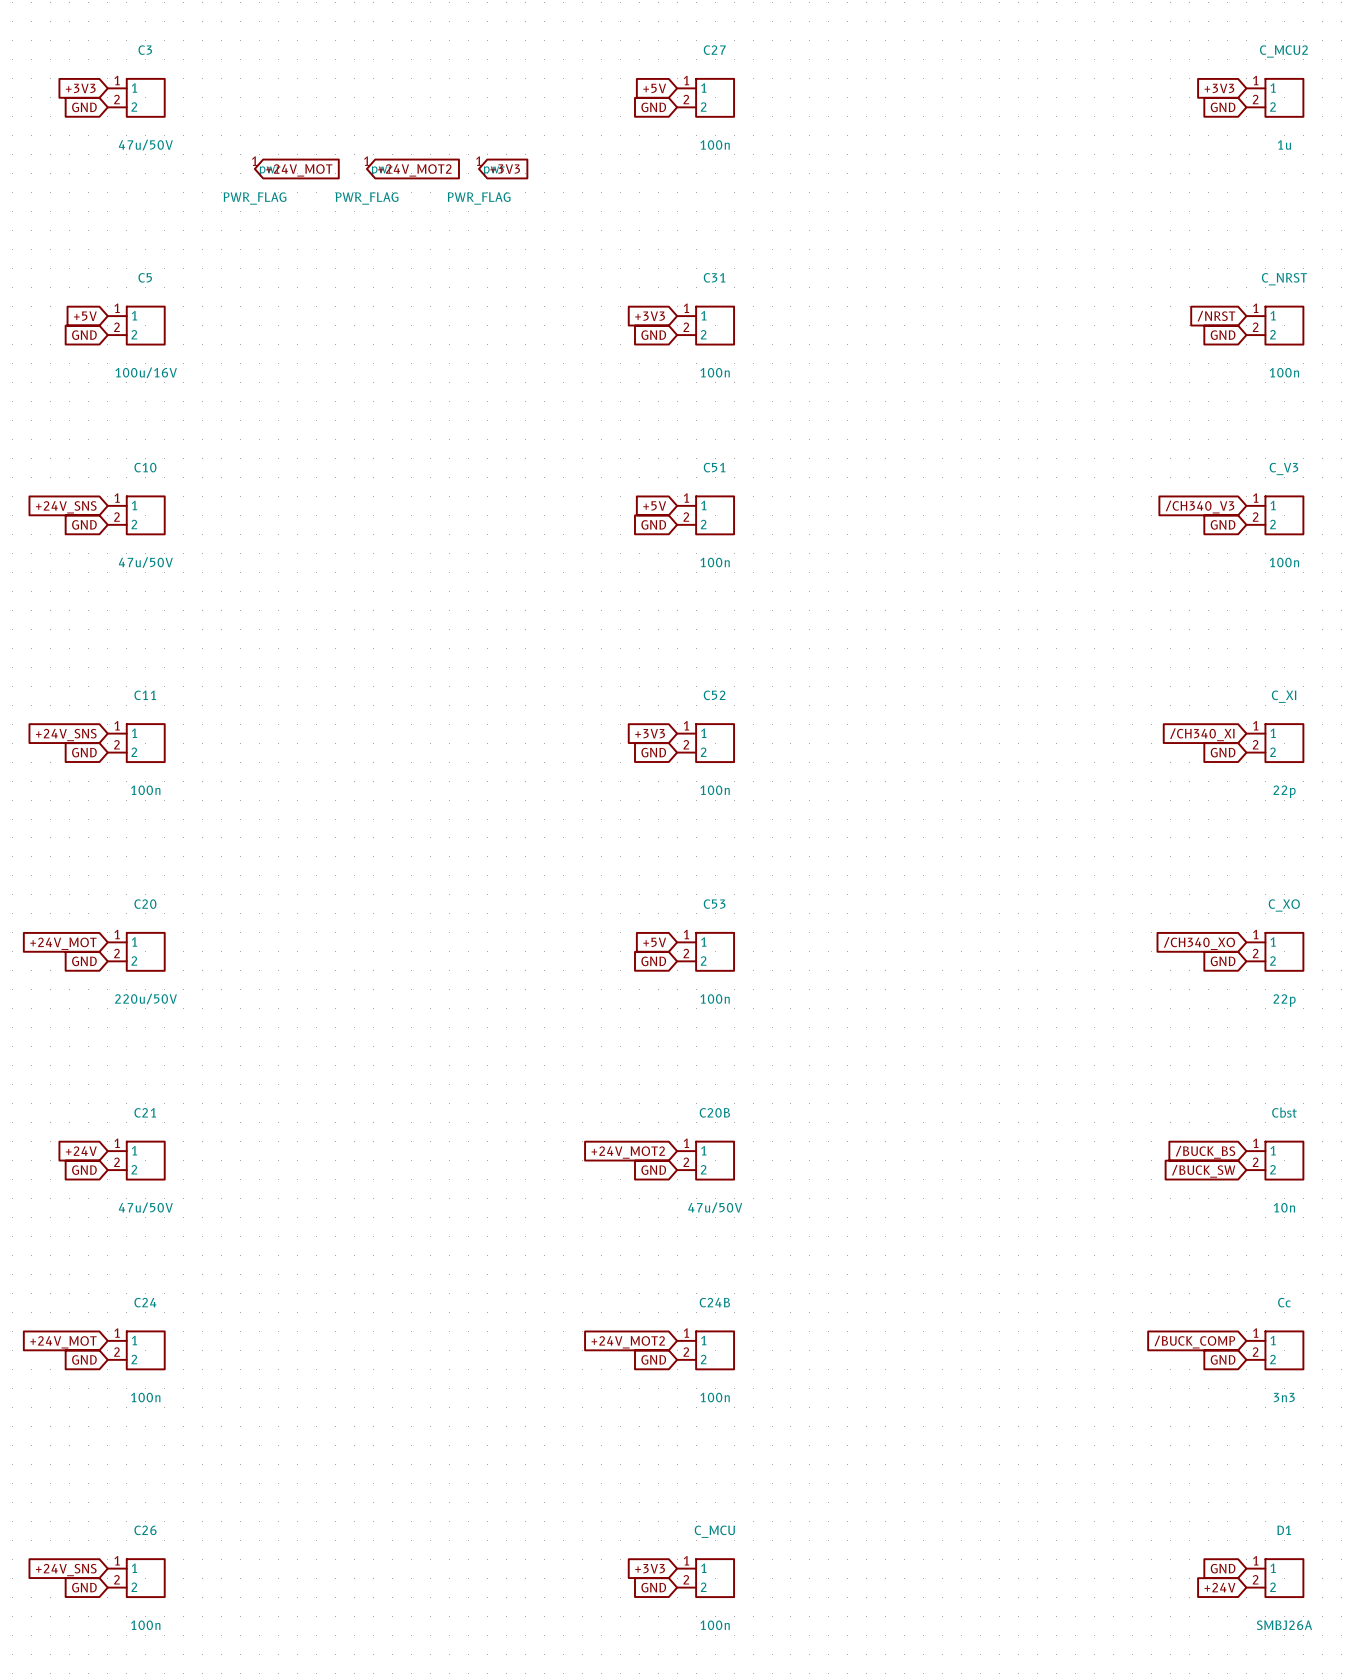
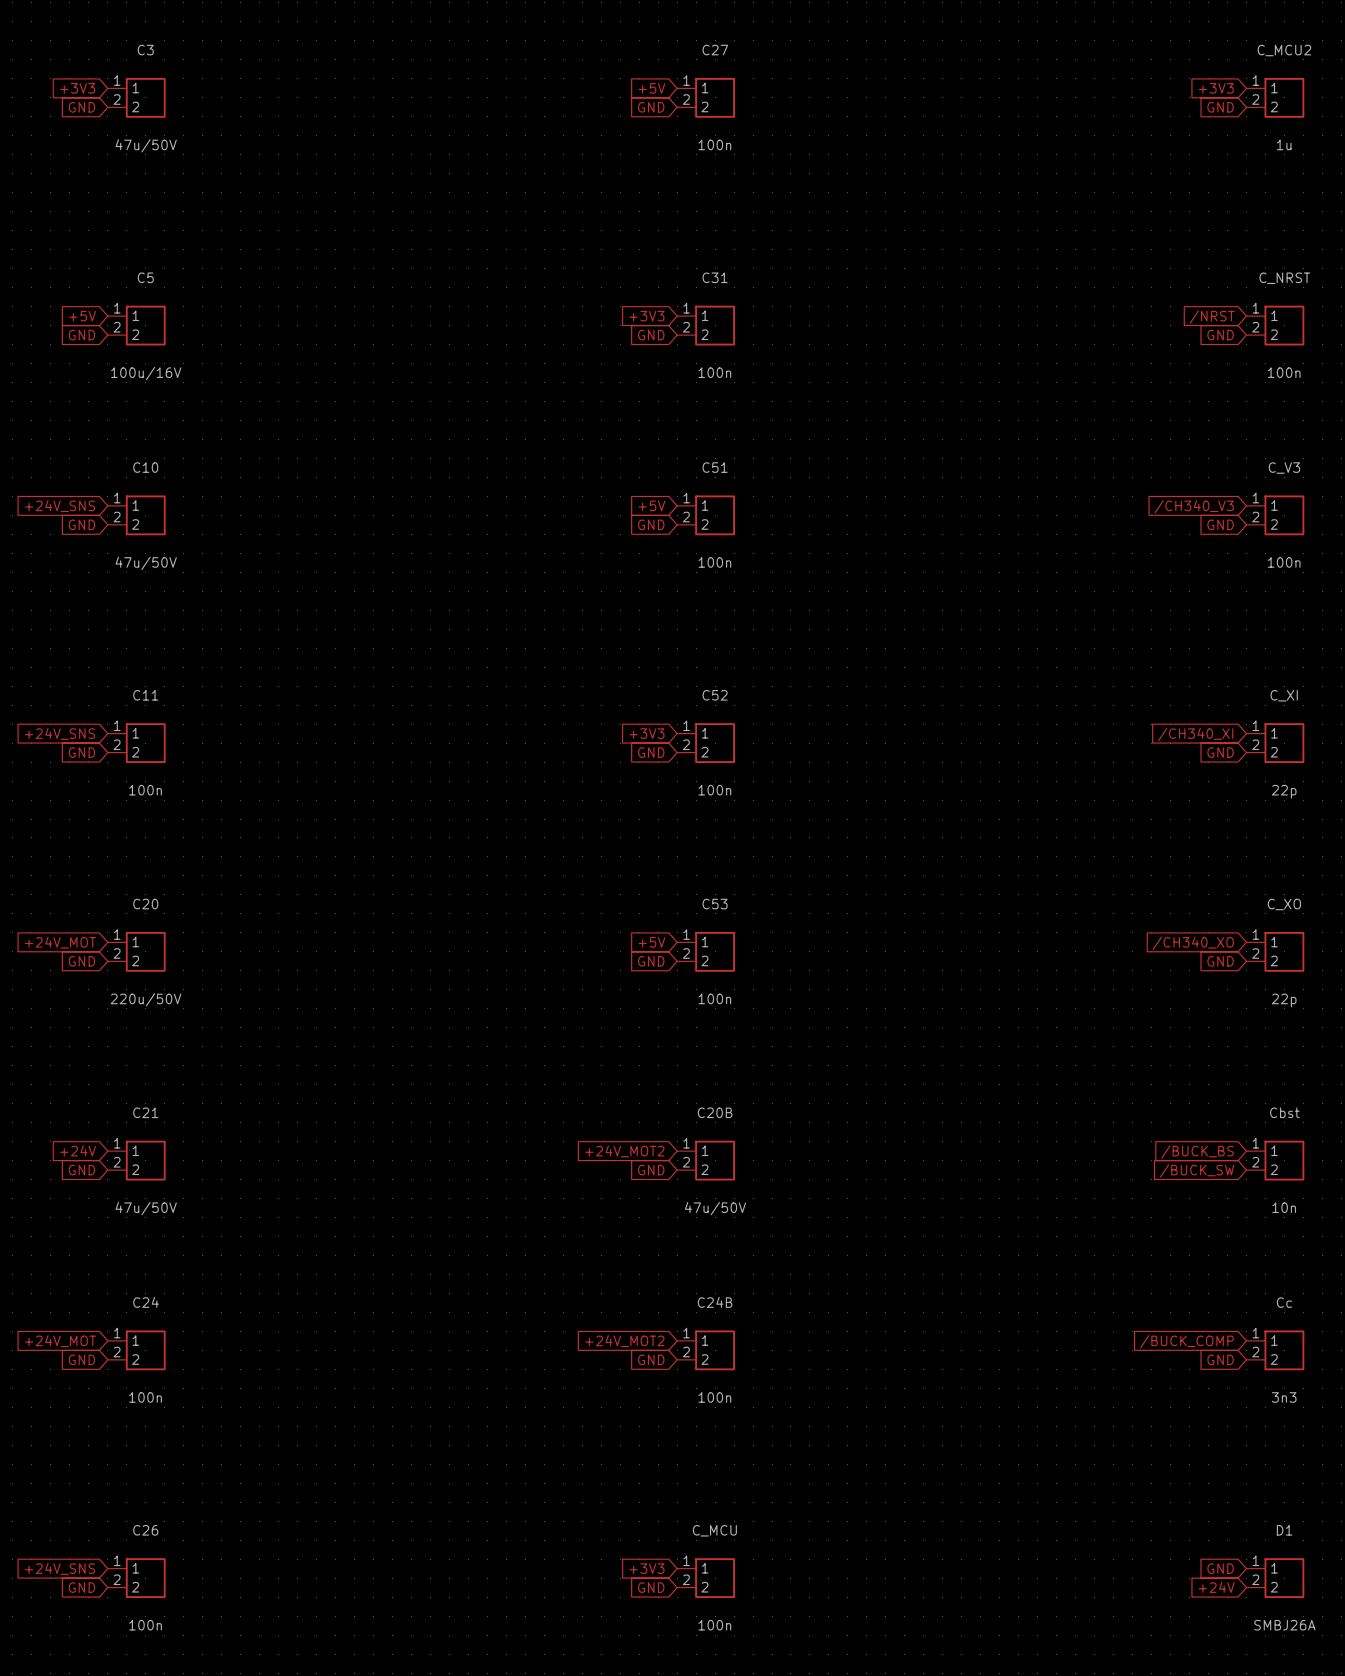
global label: +3V3 (505, 169) -> none
global label: +24V_MOT (299, 170) -> none
global label: +24V_MOT2 (414, 170) -> none
power symbol: PWR_FLAG (255, 180) -> none
power symbol: PWR_FLAG (367, 180) -> none
power symbol: PWR_FLAG (479, 180) -> none

